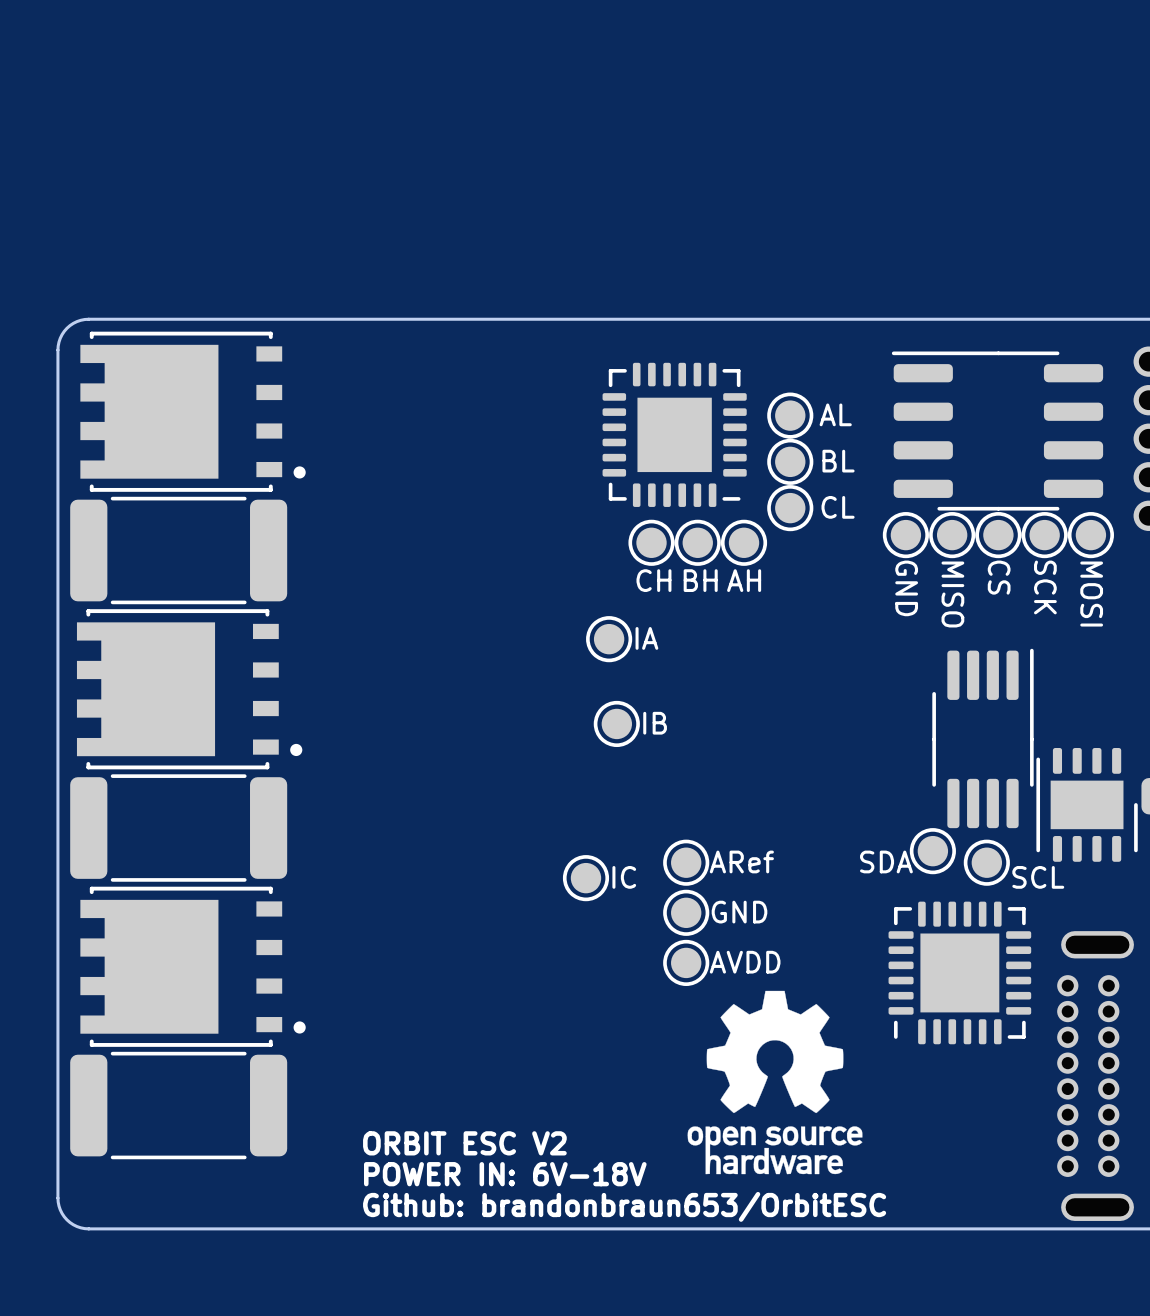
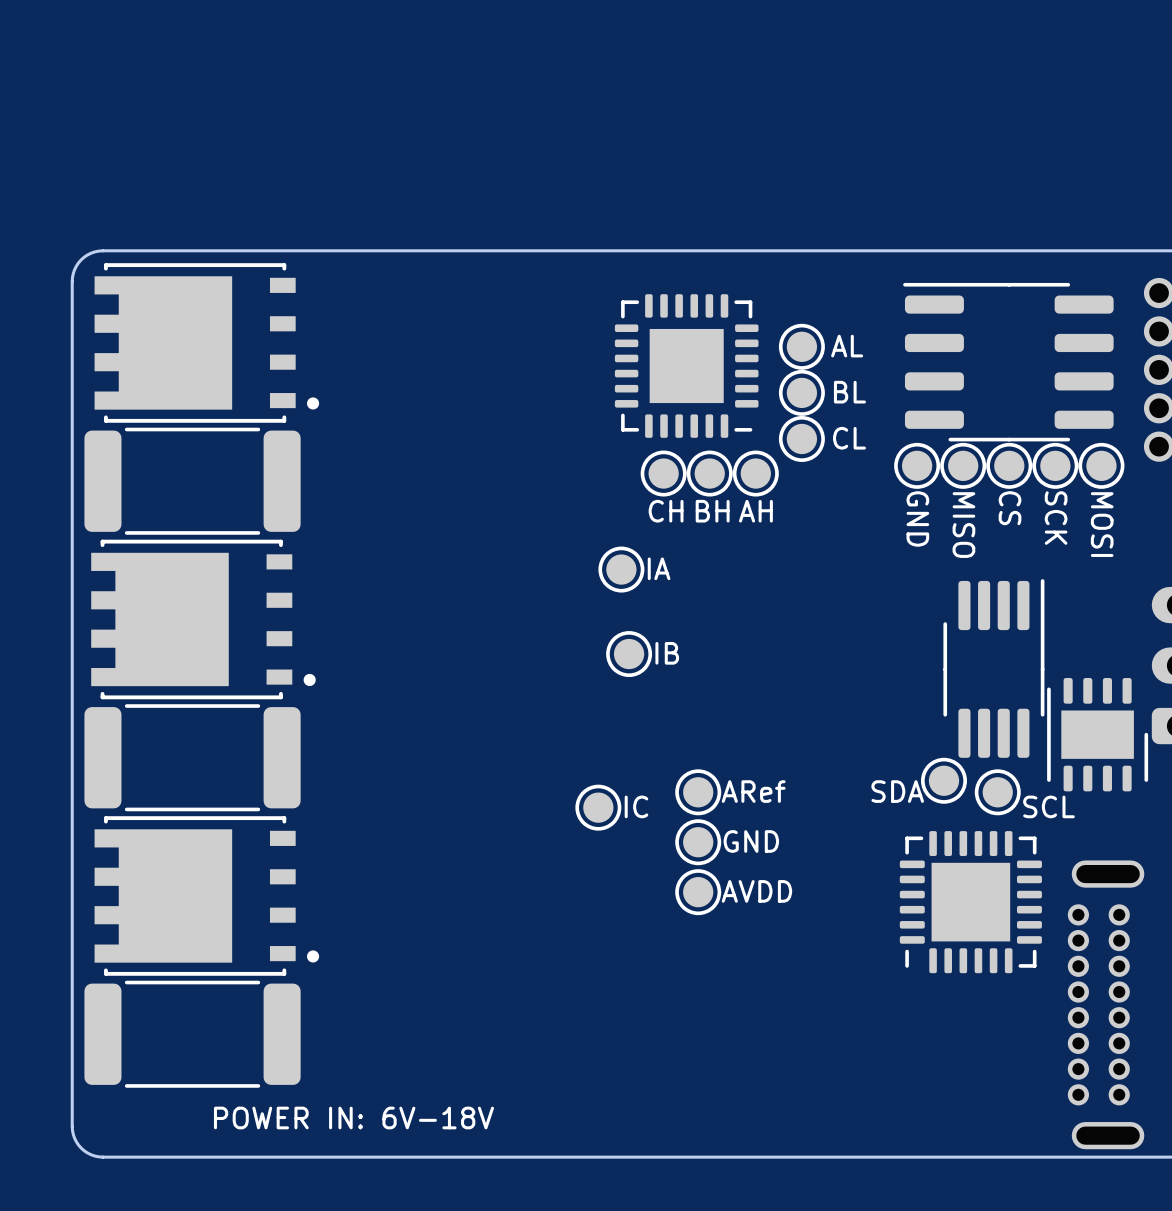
drawing: [687, 990, 863, 1175] -> none
text: ORBIT ESC V2 (464, 1143) -> none
text position: POWER IN: 6V-18V (505, 1174) -> POWER IN: 6V-18V (353, 1117)
text: Github: brandonbraun653/OrbitESC (624, 1206) -> none

